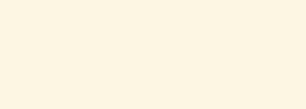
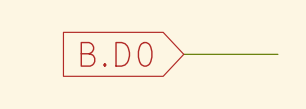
global label: none -> B.D0 (116, 54)
wire: none -> (183, 54) (277, 54)

